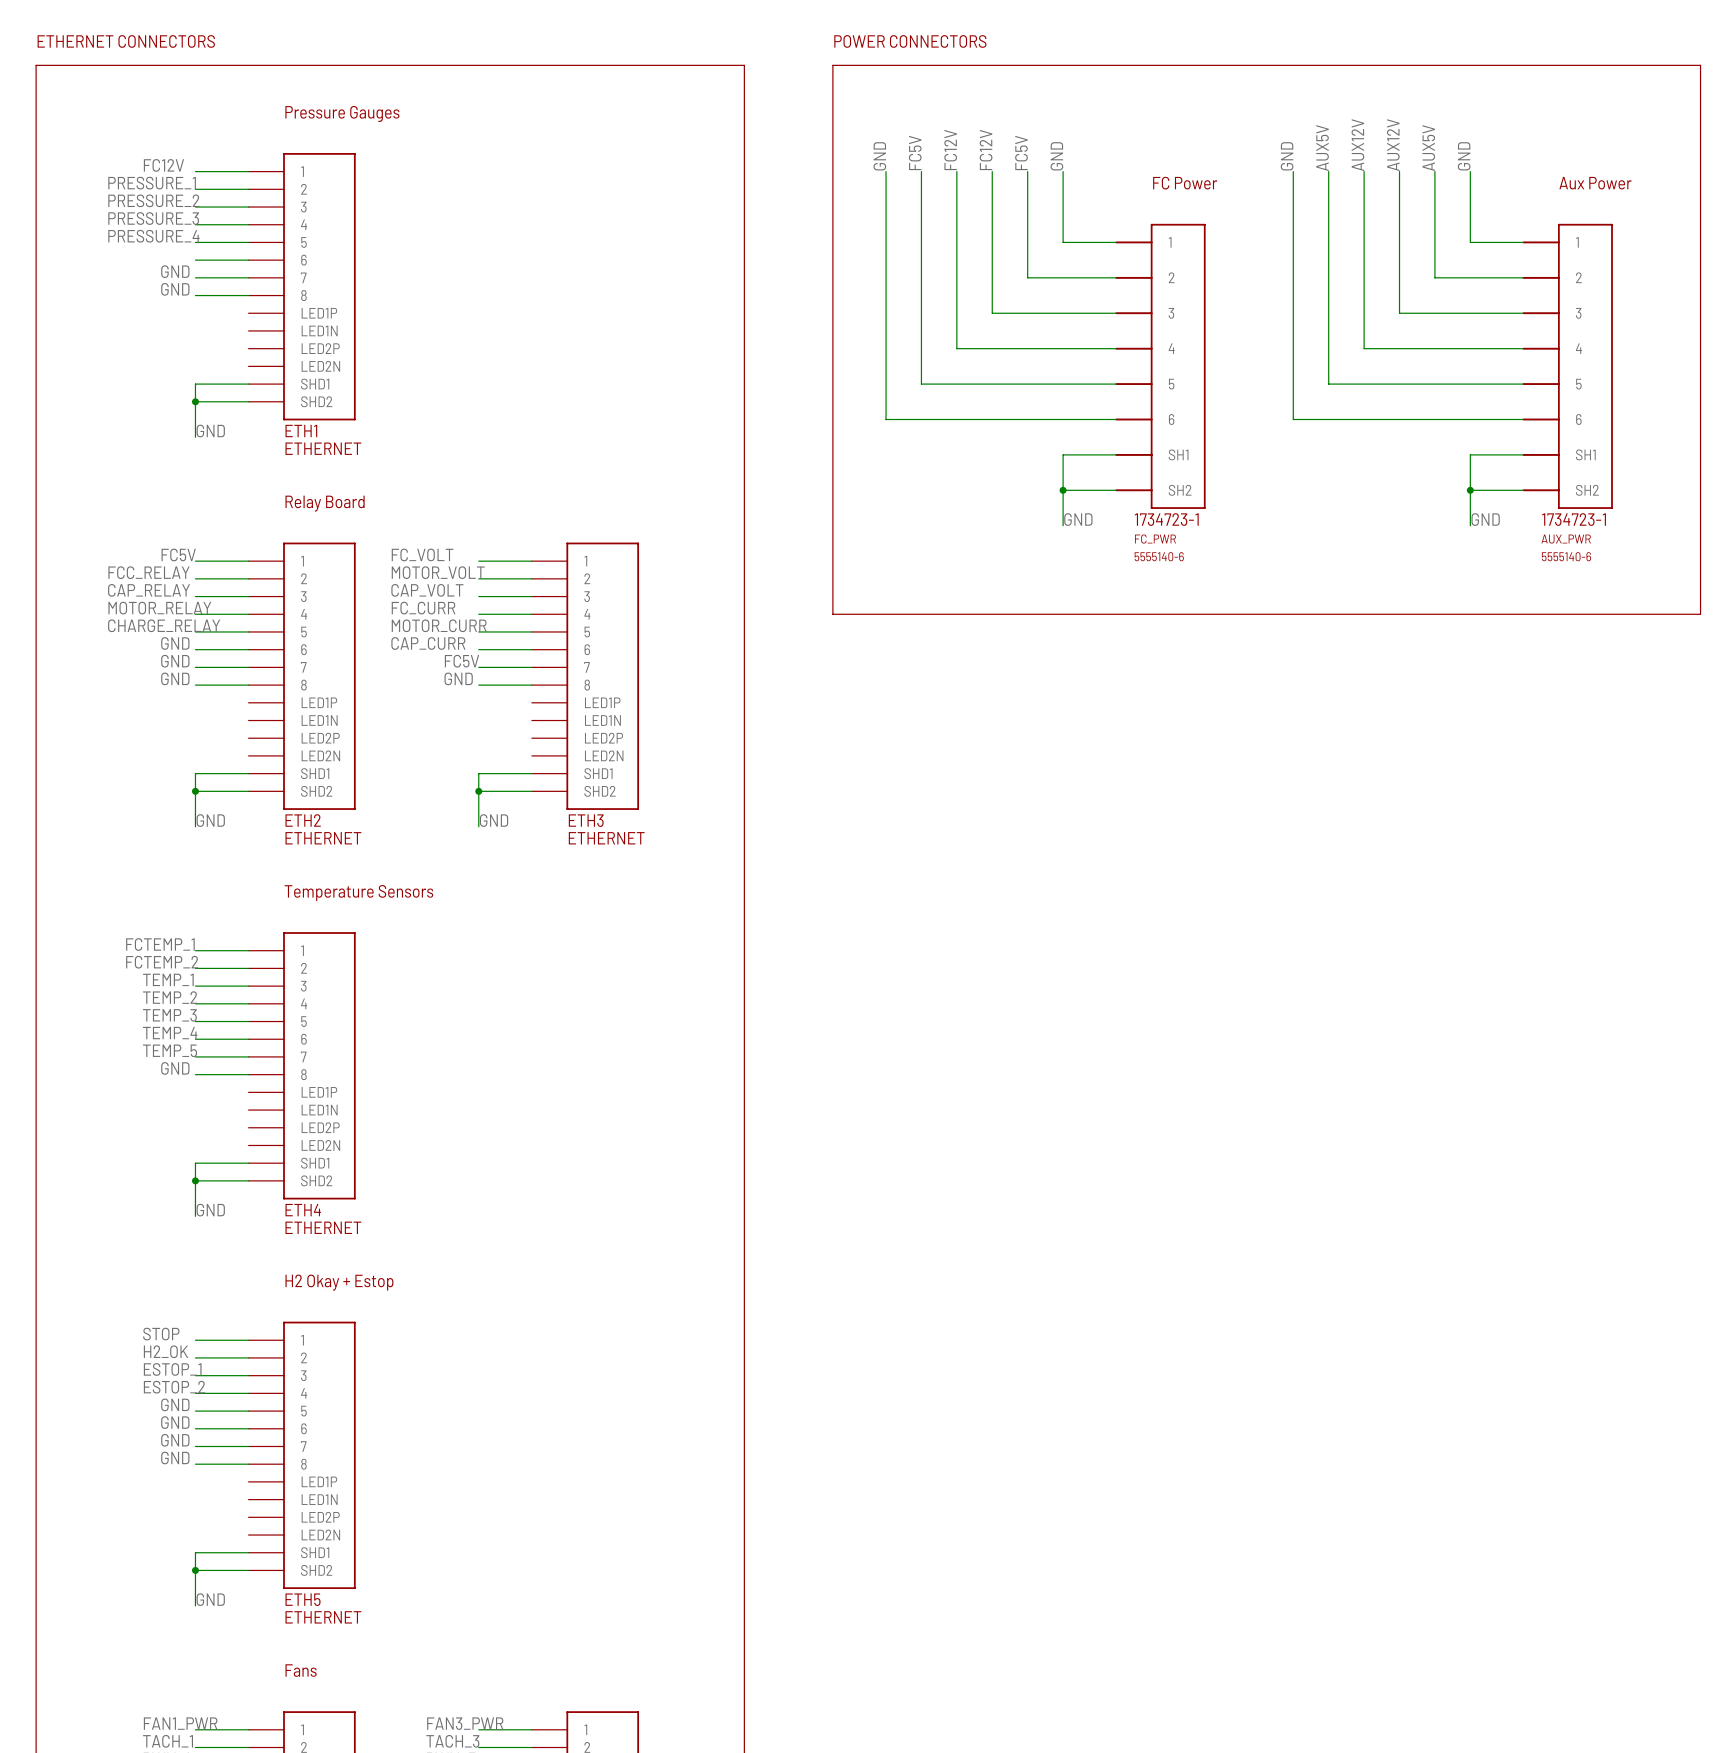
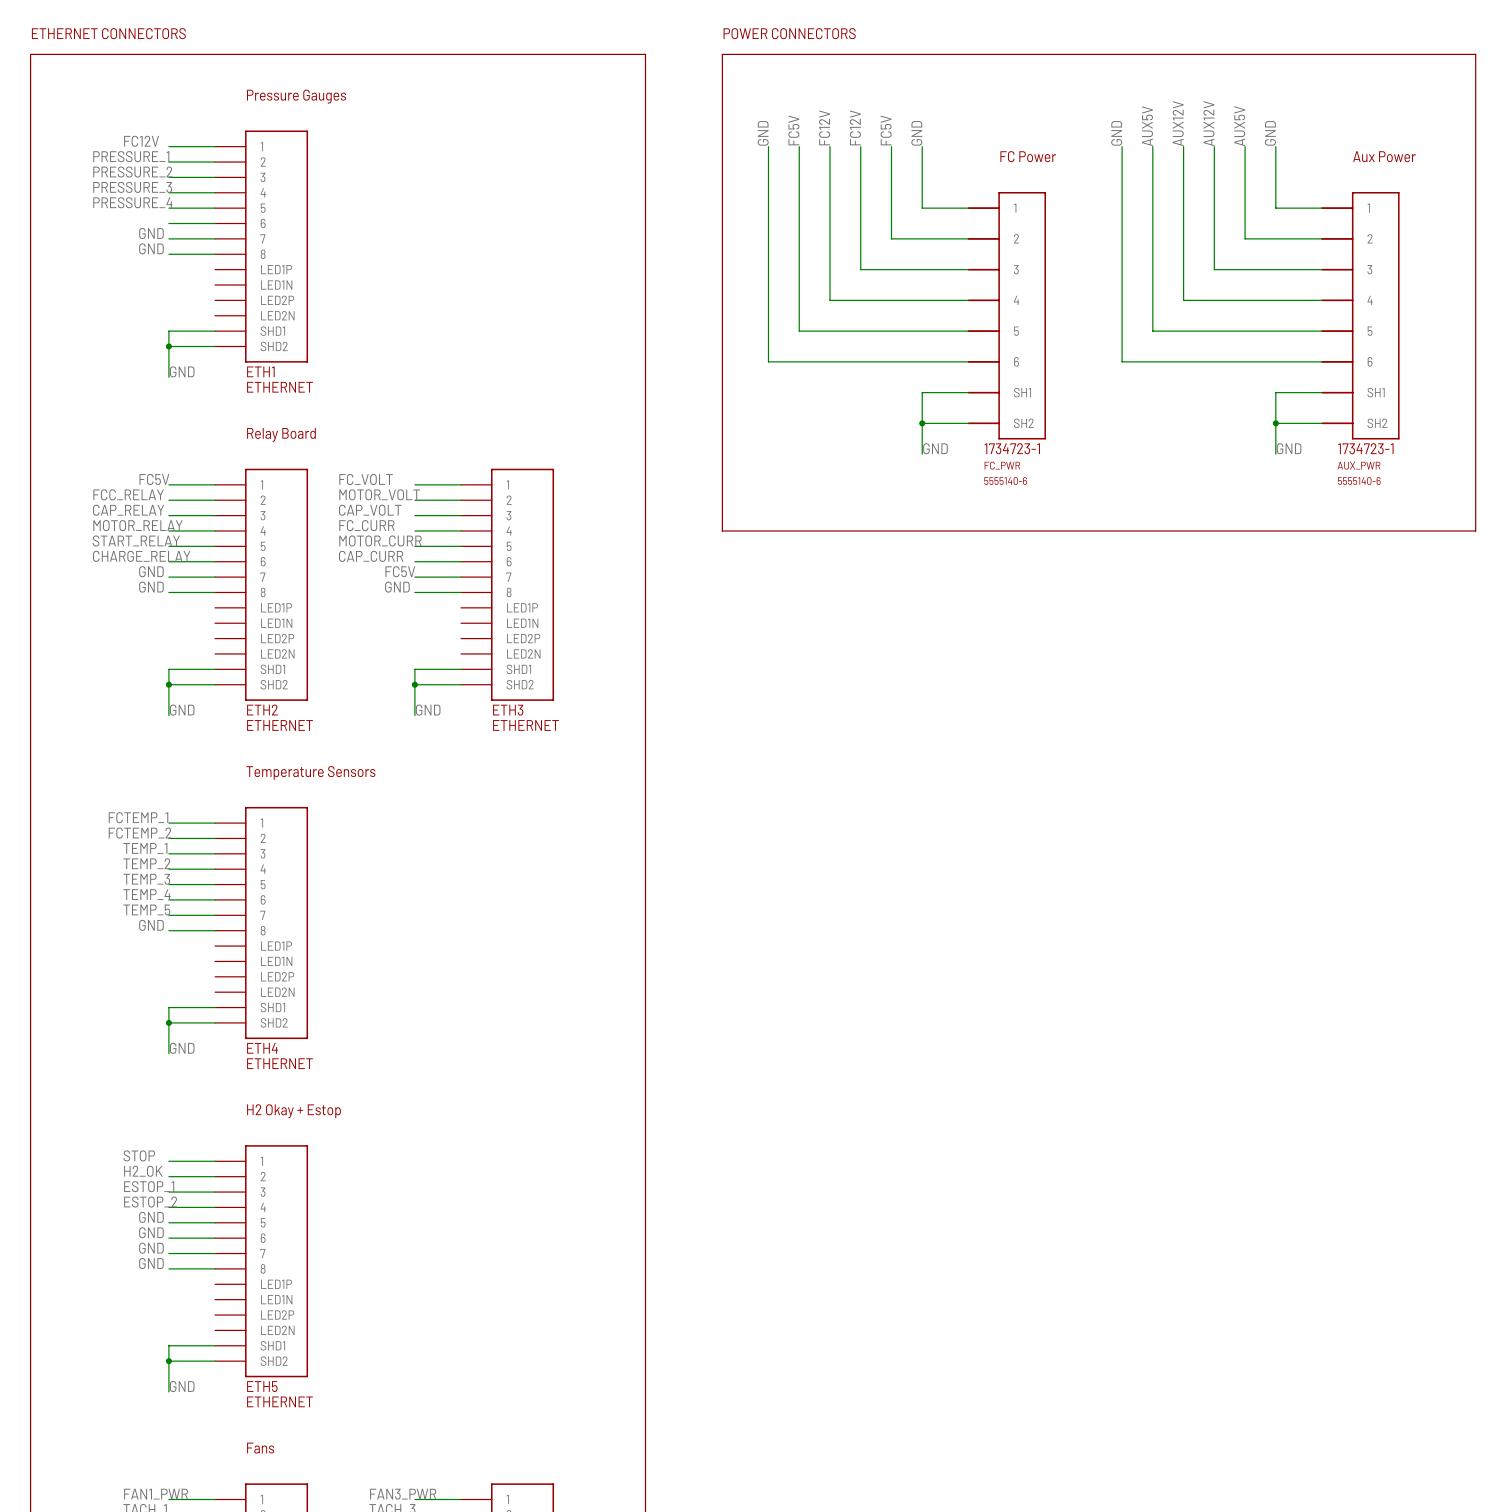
label: CHARGE_RELAY (164, 625) -> START_RELAY (136, 540)
label: none -> CHARGE_RELAY (141, 556)
label: GND (175, 643) -> none

